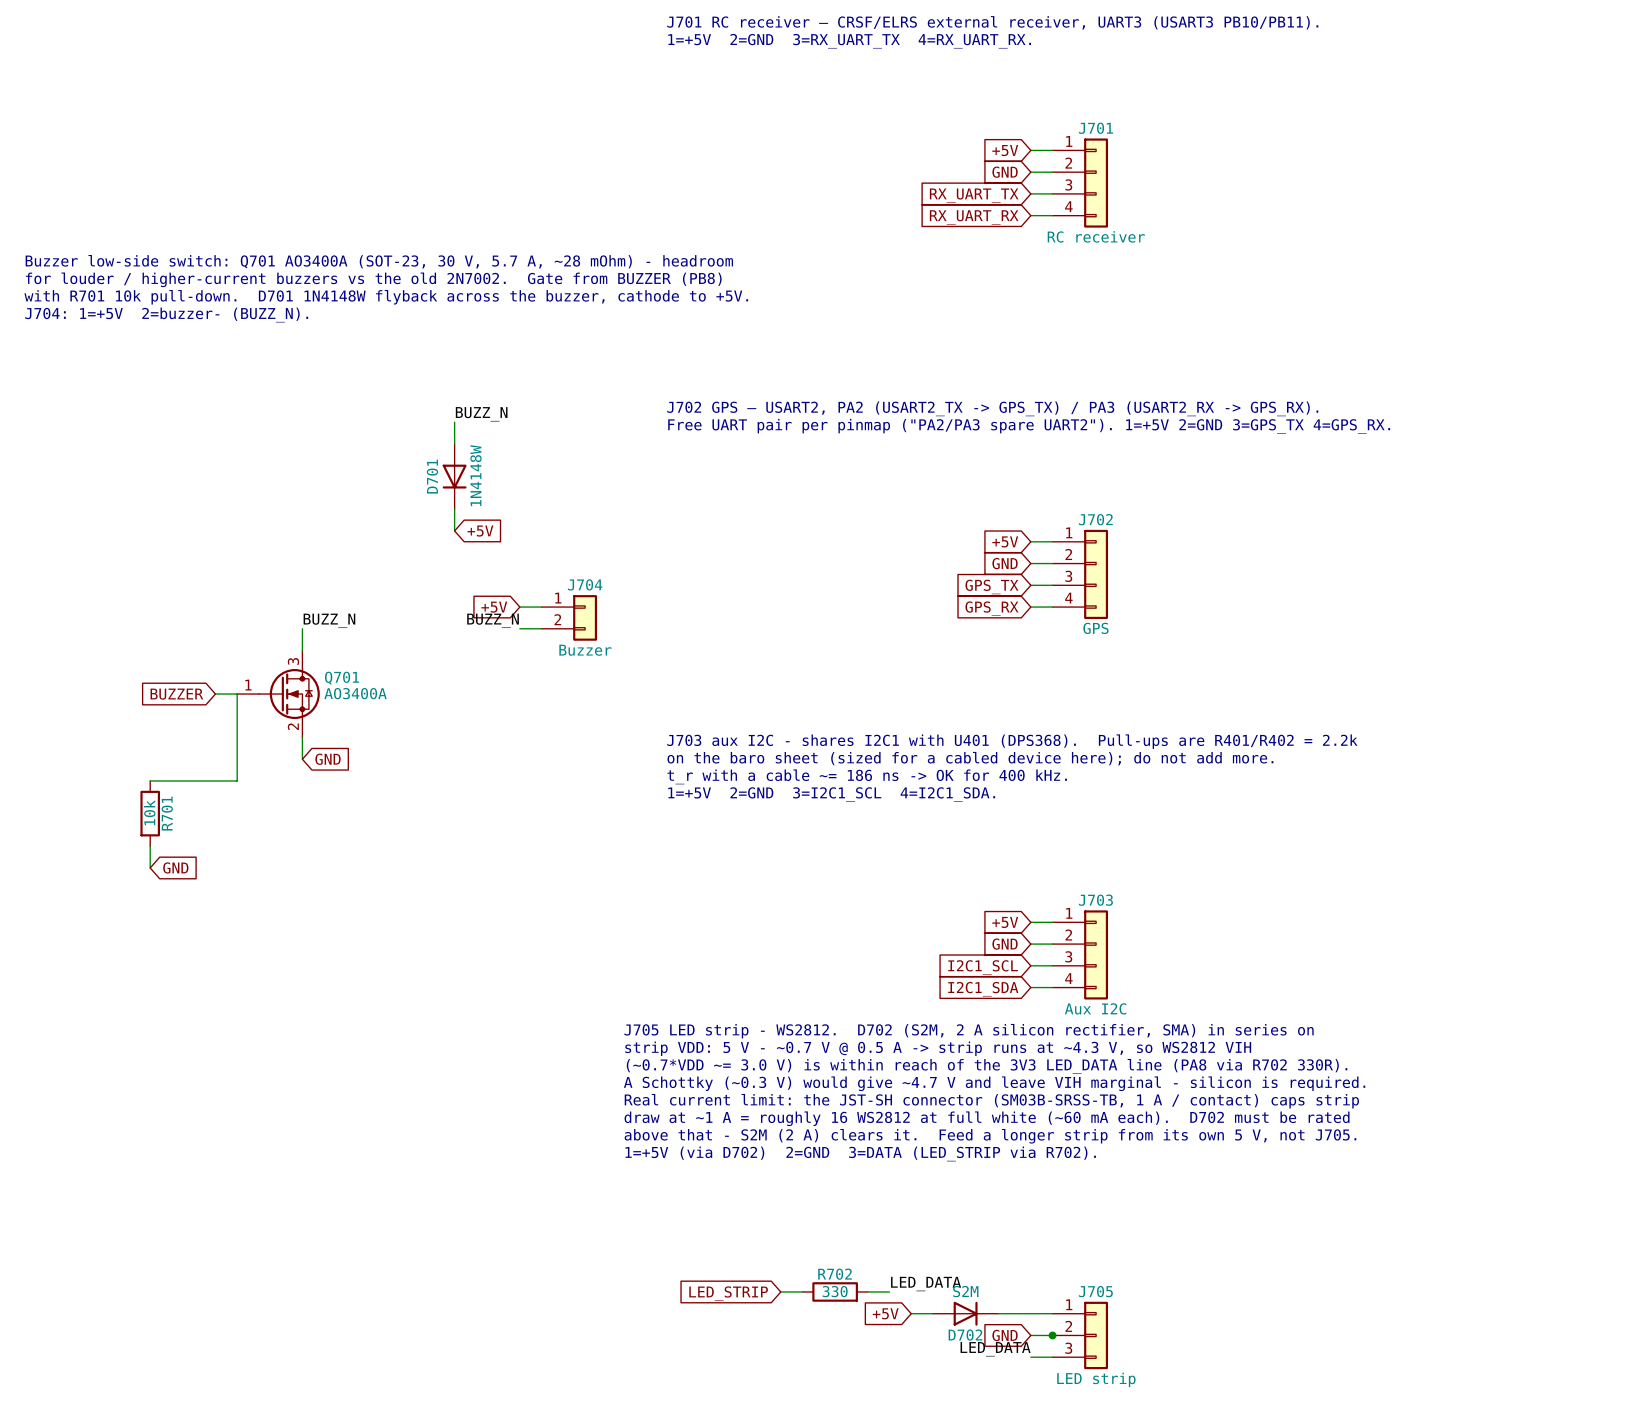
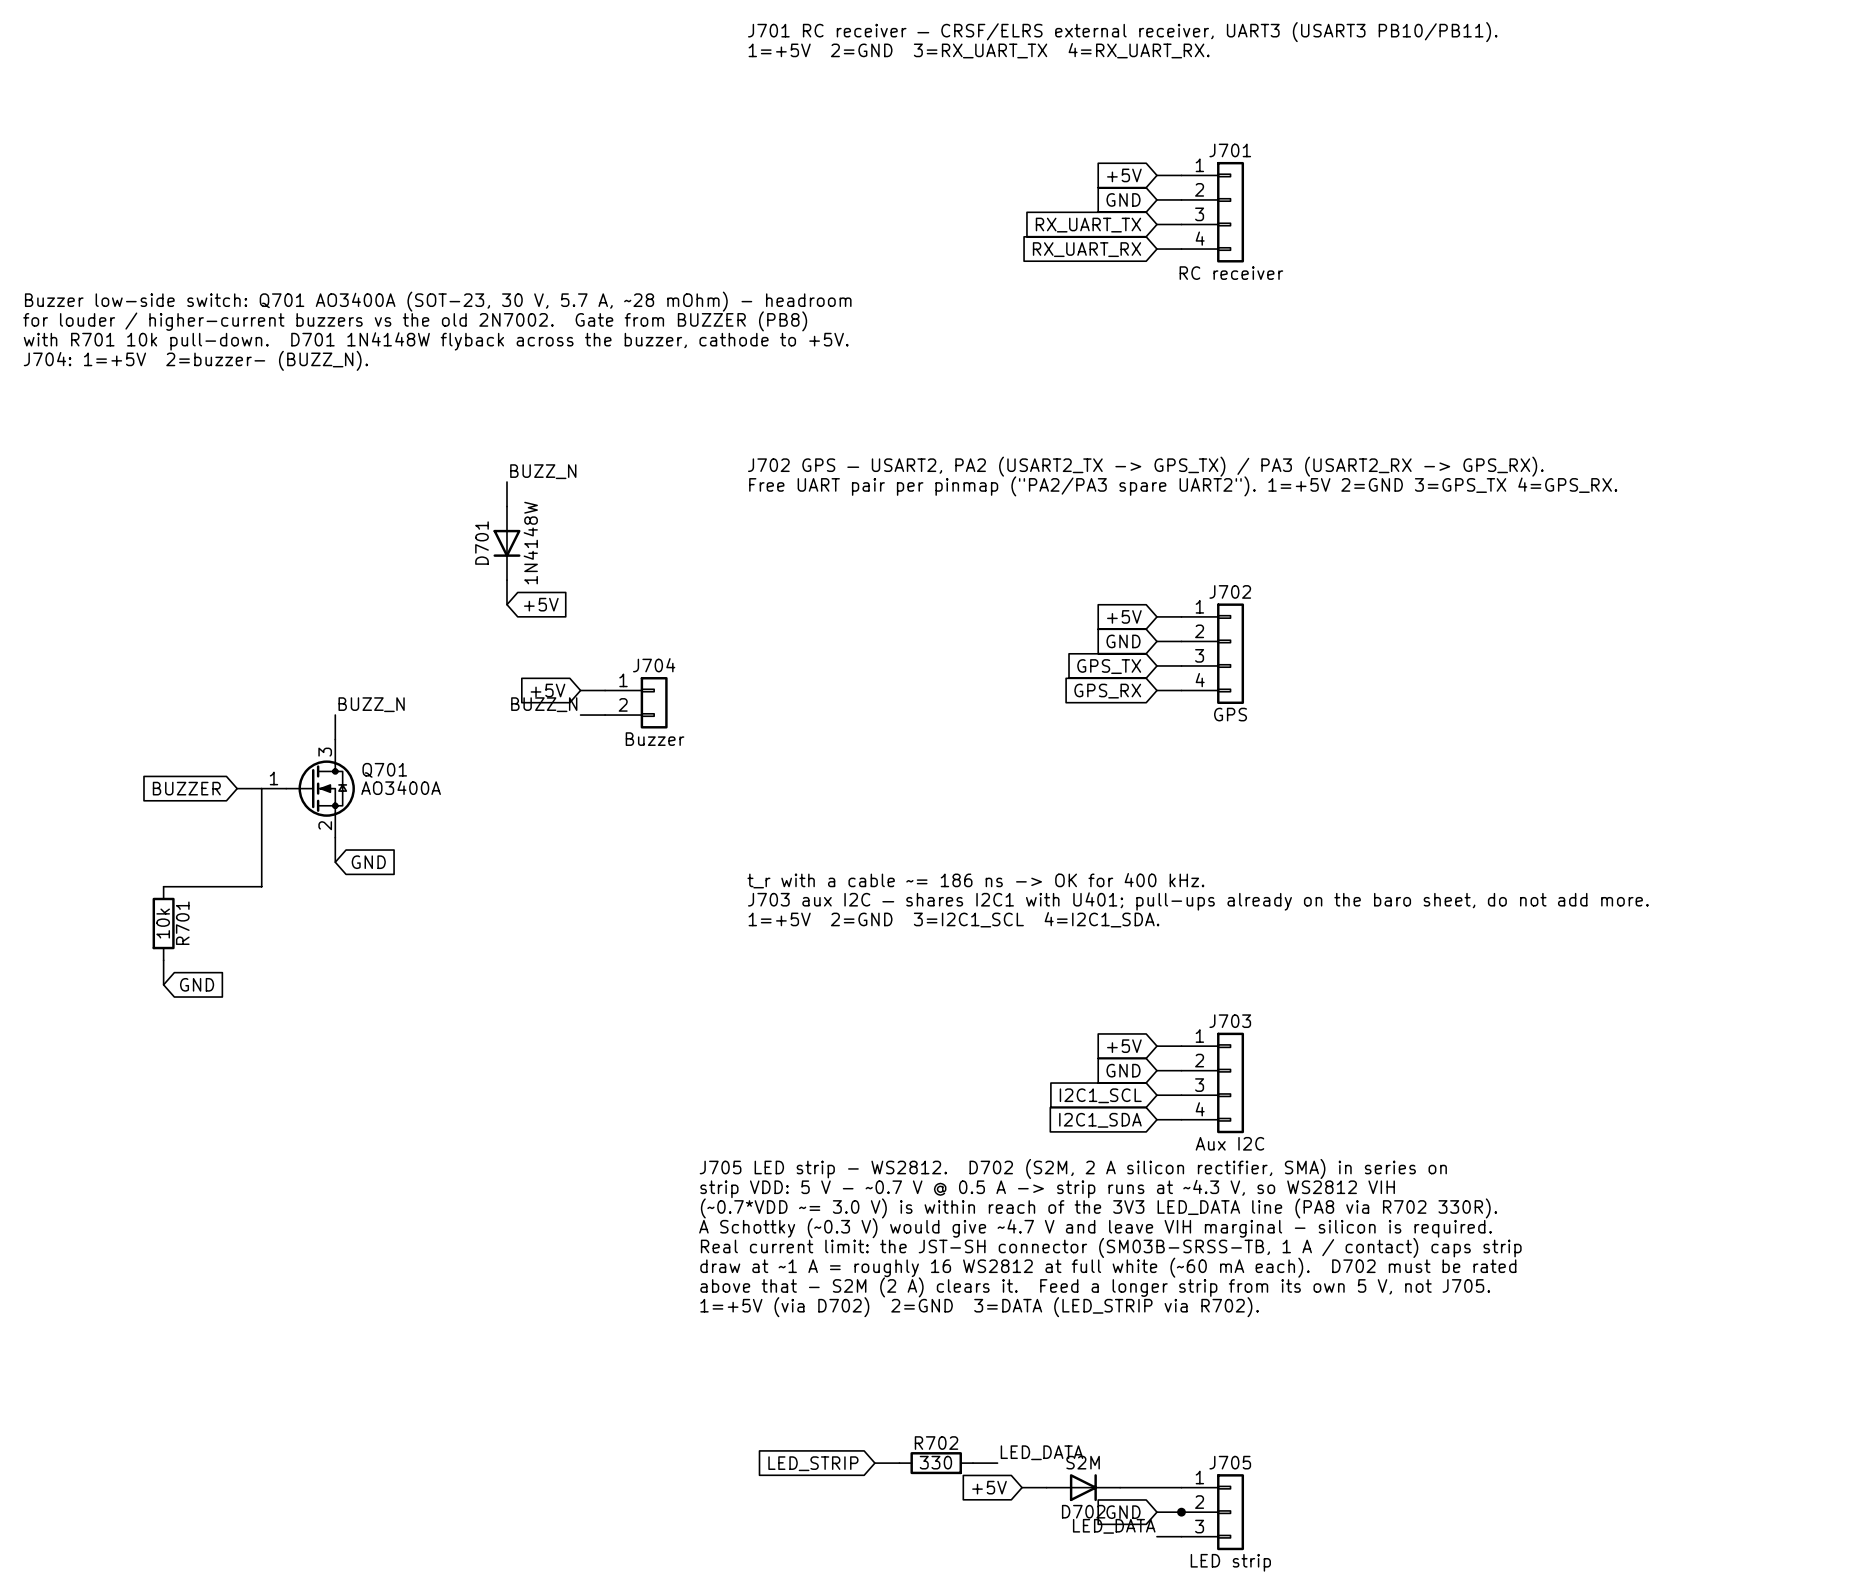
text: J703 aux I2C - shares I2C1 with U401 (DPS368). Pull-ups are R401/R402 = 2.2k (1012, 741) -> none
text: on the baro sheet (sized for a cabled device here); do not add more. (970, 758) -> none
text: 1=+5V 2=GND 3=I2C1_SCL 4=I2C1_SDA. (831, 794) -> J703 aux I2C — shares I2C1 with U401; pull-ups already on the baro sheet, do not add more. (1198, 901)
text: none -> 1=+5V 2=GND 3=I2C1_SCL 4=I2C1_SDA. (953, 919)

